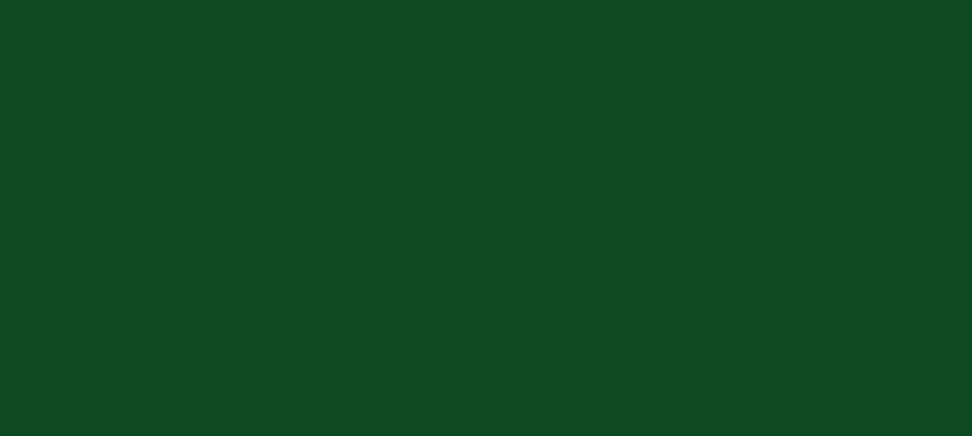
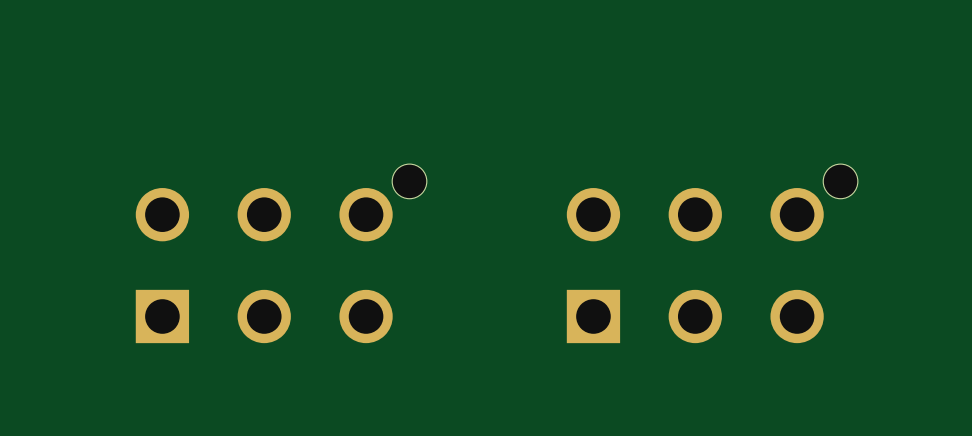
part: none -> (281, 253)
part: none -> (712, 253)

